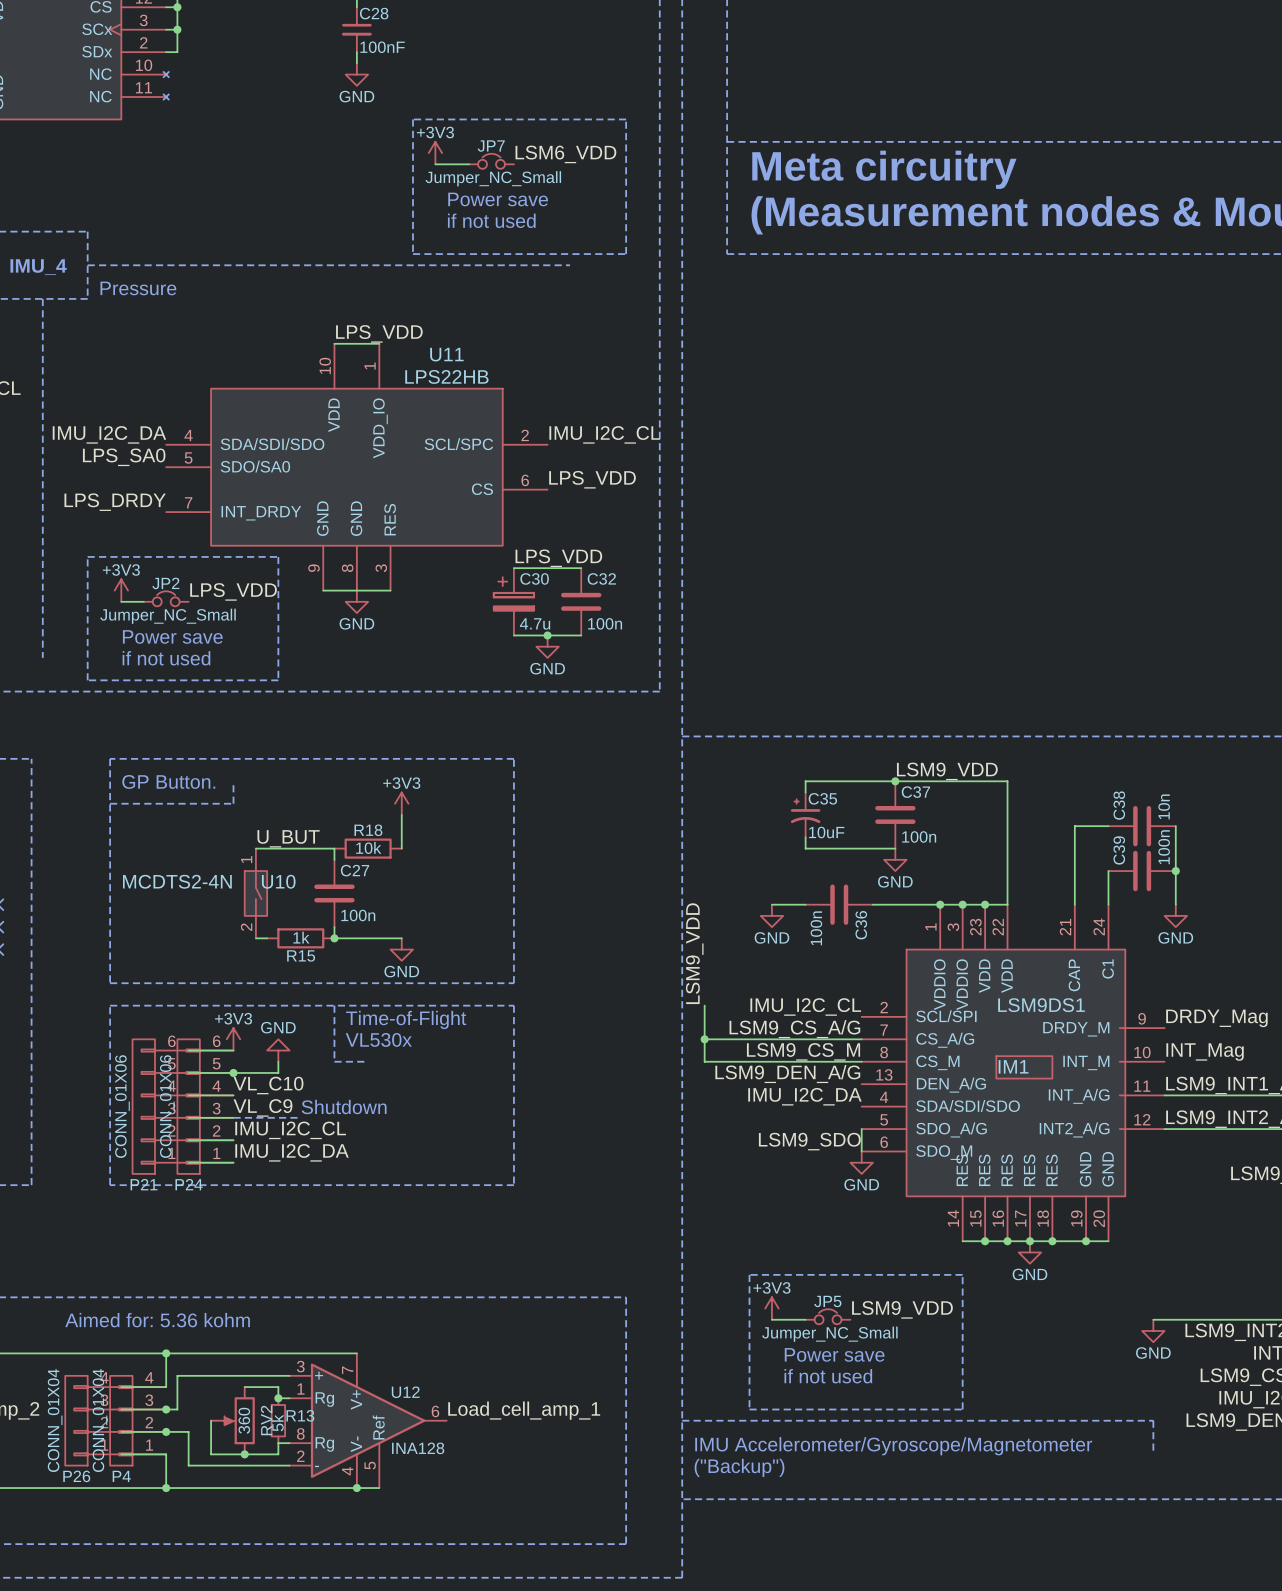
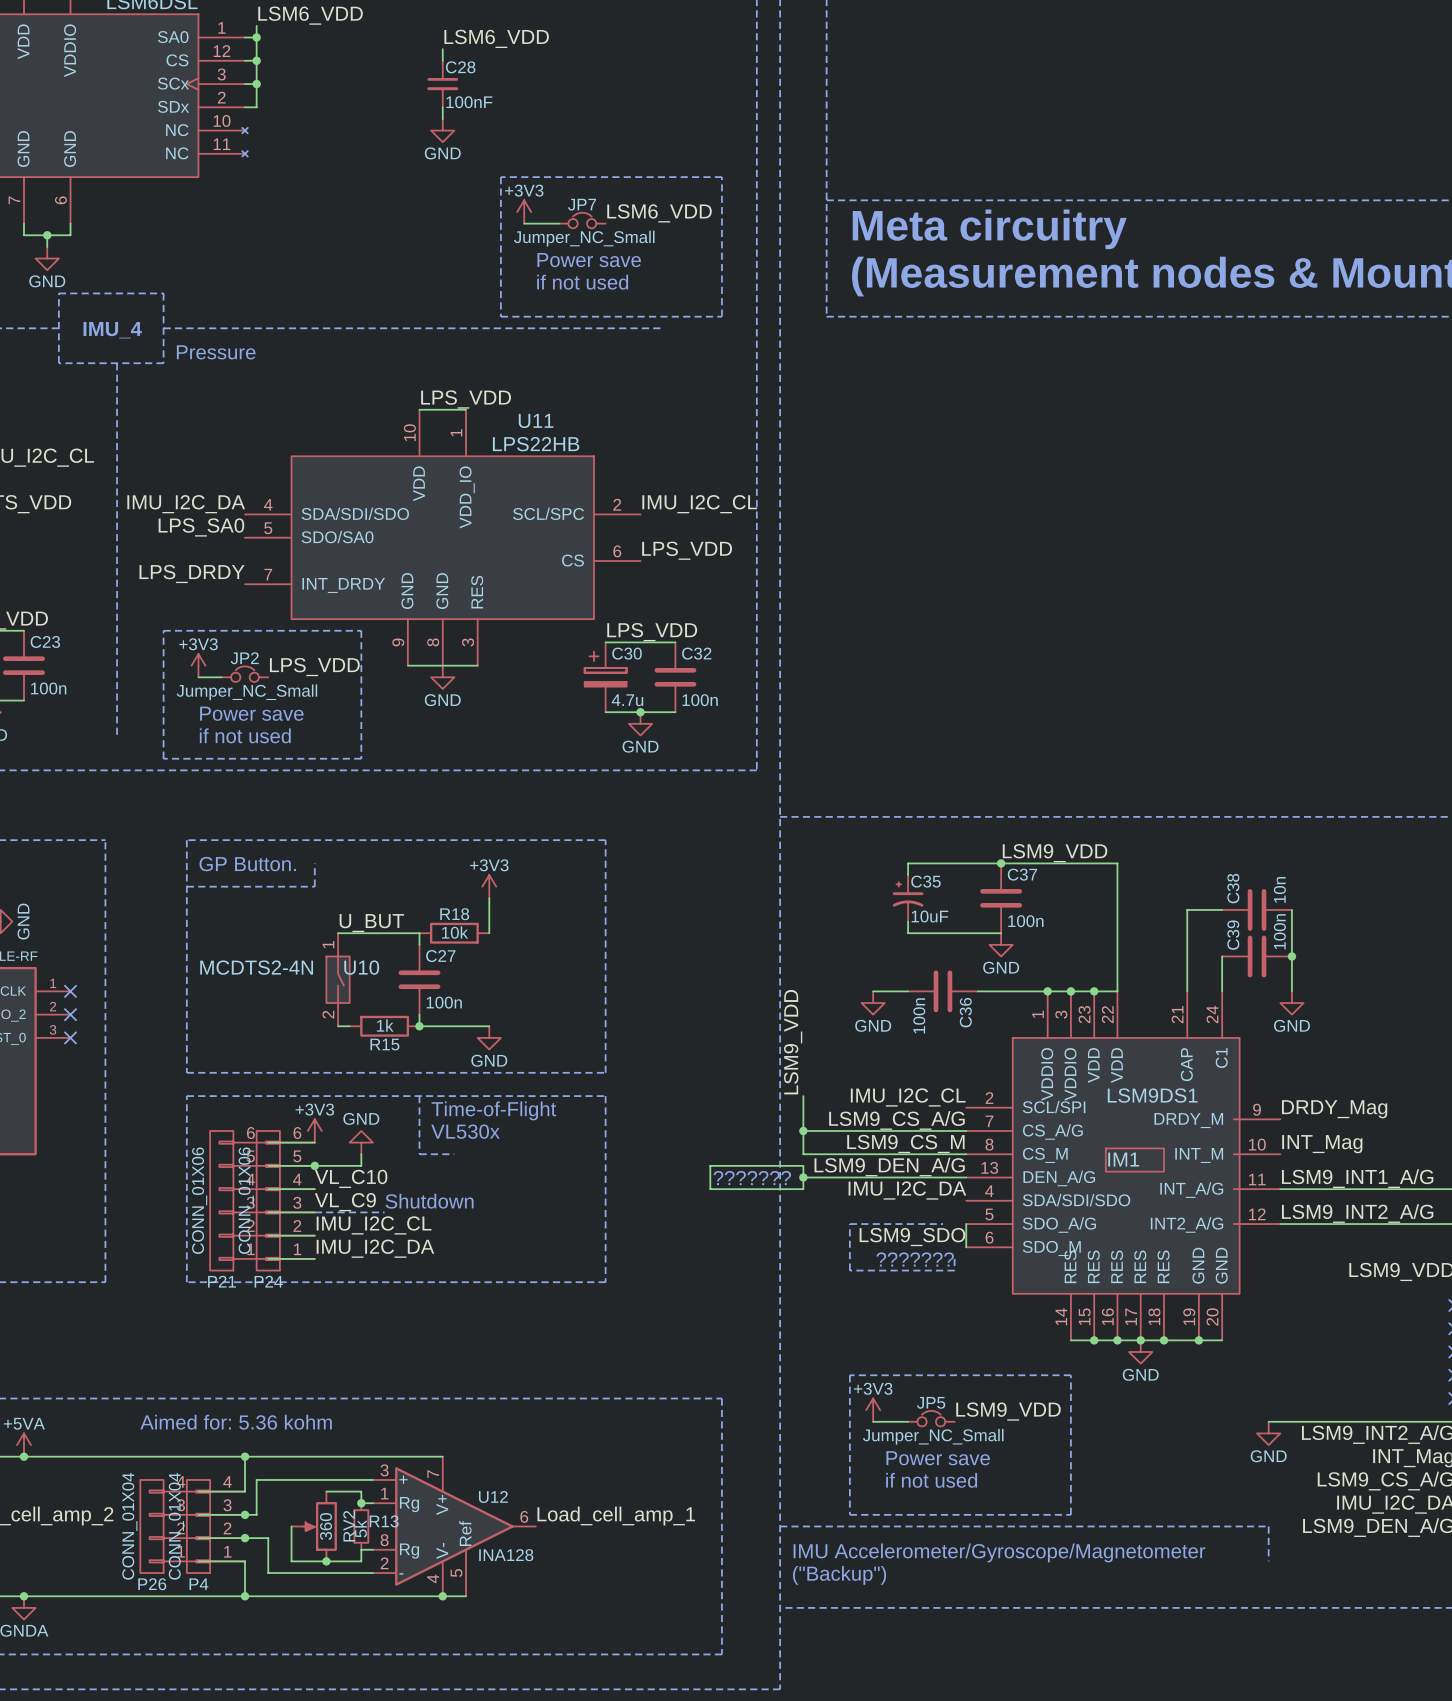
wire: none -> (710, 1165) (803, 1165) (803, 1189) (710, 1189) (710, 1165)
text: none -> ??????? (752, 1178)
wire: none -> (803, 1177) (966, 1177)
junction: none -> (803, 1177)
line: none -> (942, 1224) (849, 1224) (849, 1270) (954, 1270) (954, 1258)
power symbol: GND (861, 1162) -> none
text: none -> ??????? (915, 1259)

